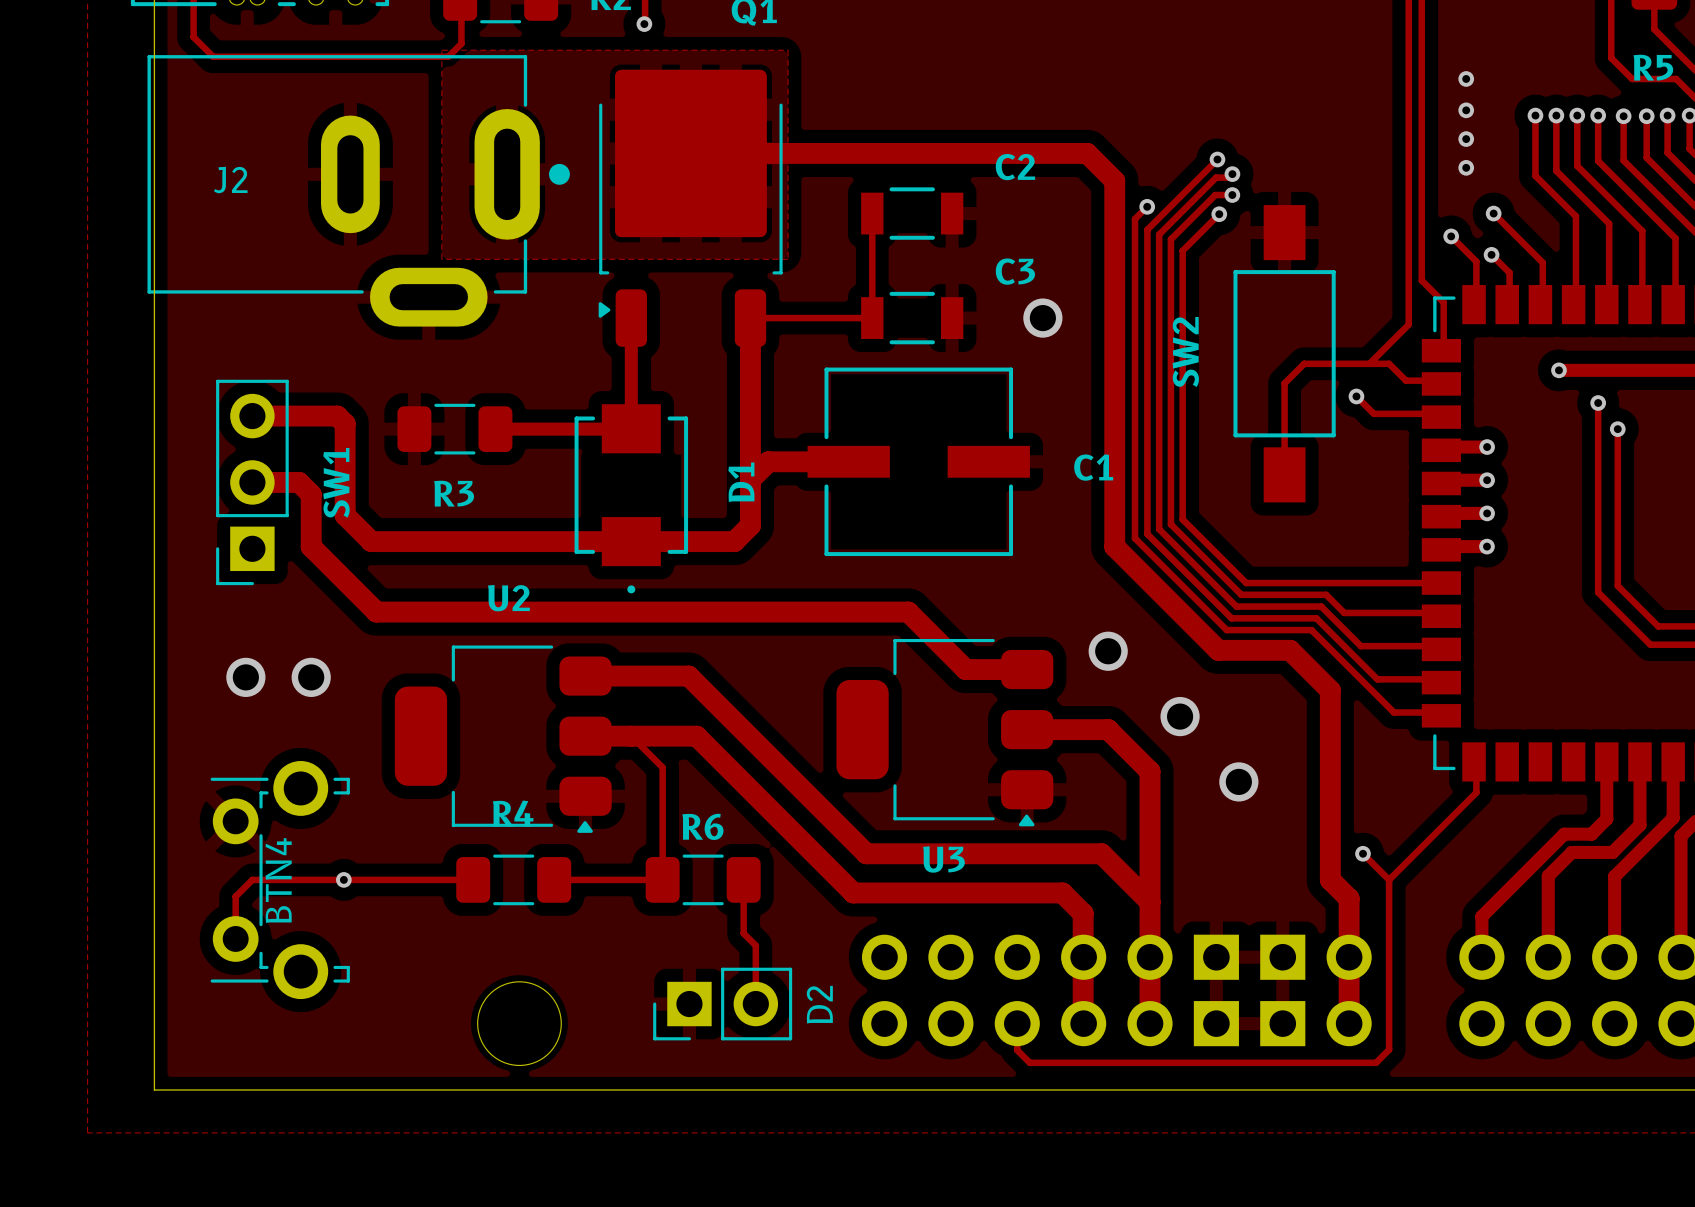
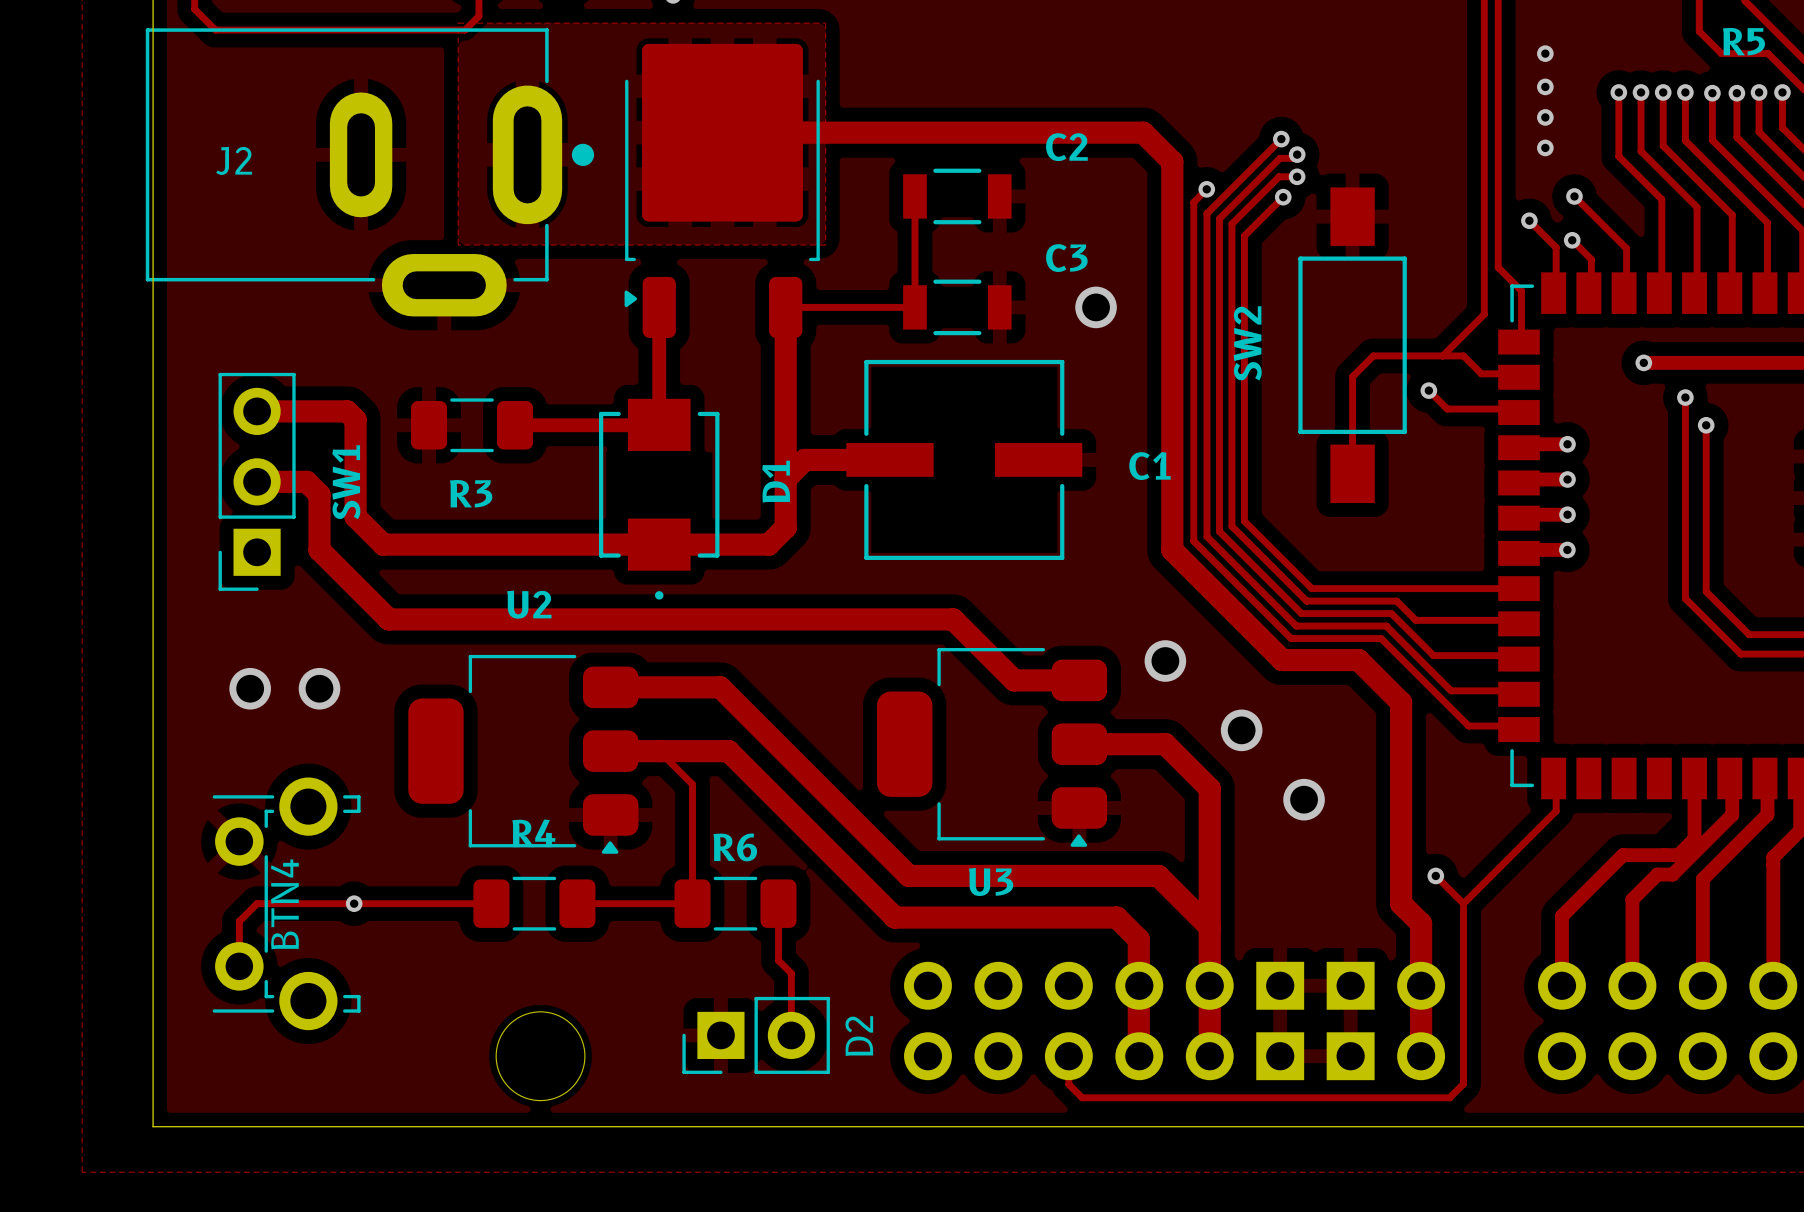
track: (1639, 761) (1639, 825) (1612, 852) (1586, 852) -> (1732, 775) (1732, 814) (1672, 874)
track: (1673, 761) (1673, 817) (1614, 876) -> (1767, 775) (1767, 814) (1702, 879) (1702, 900)
track: (1564, 834) (1481, 916) -> (1649, 855) (1622, 855) (1561, 916) (1561, 942)

